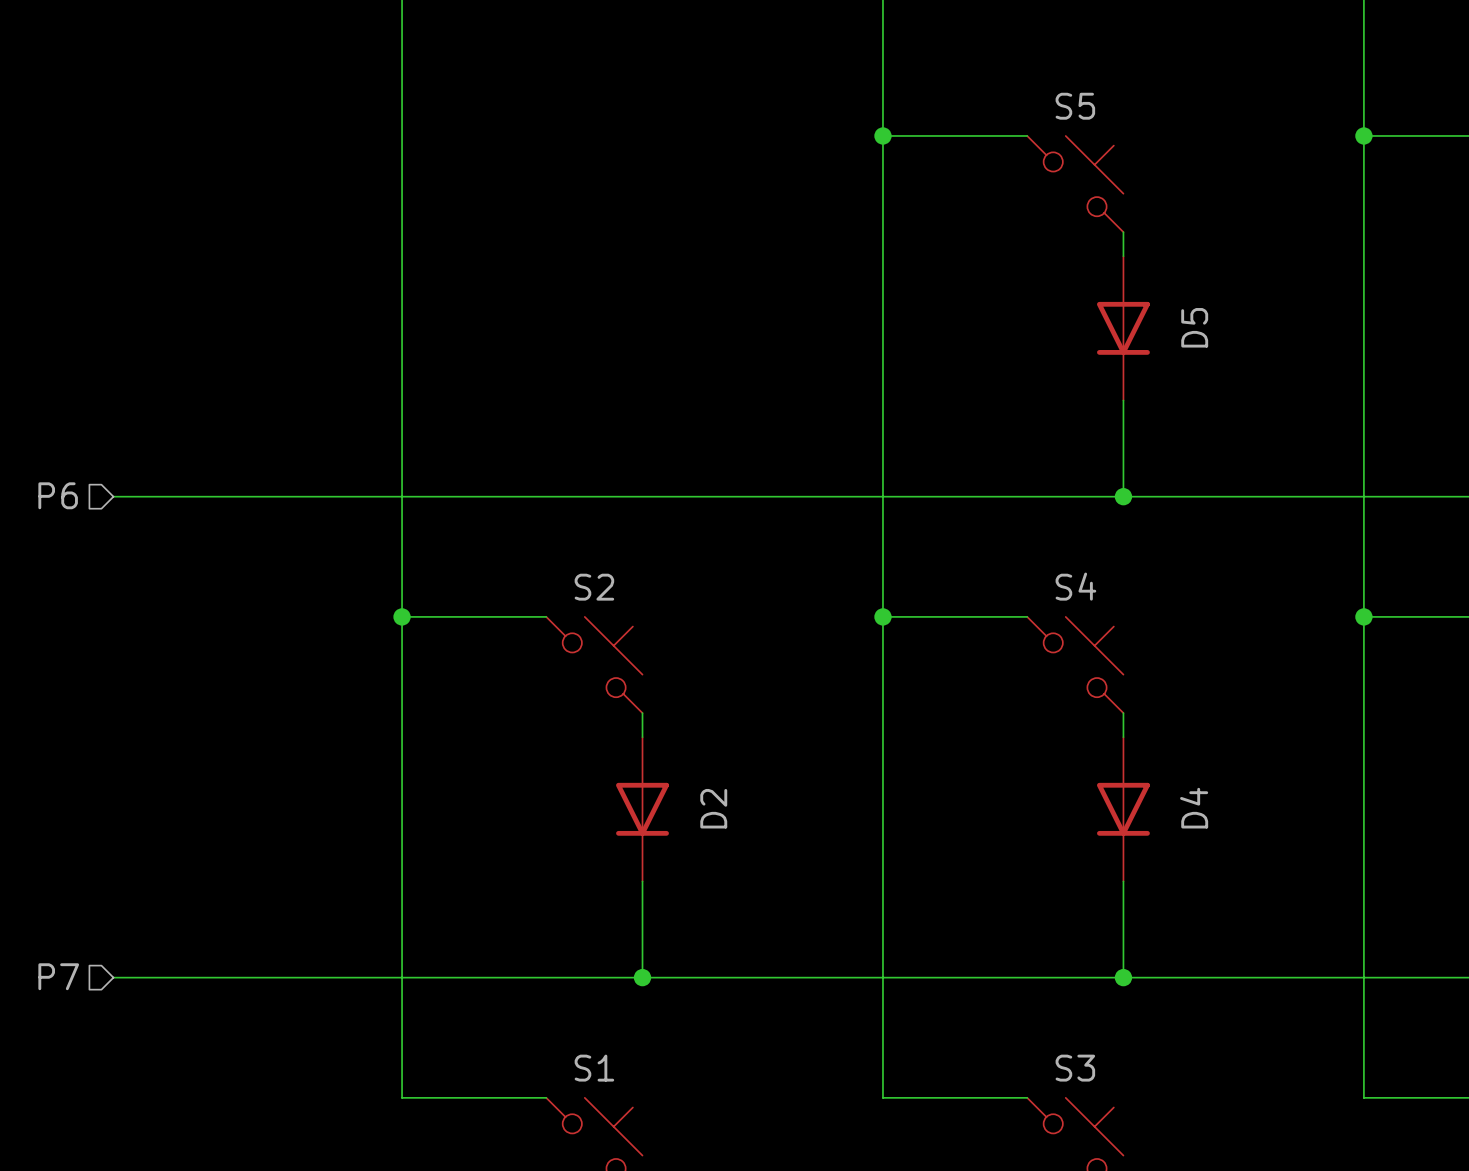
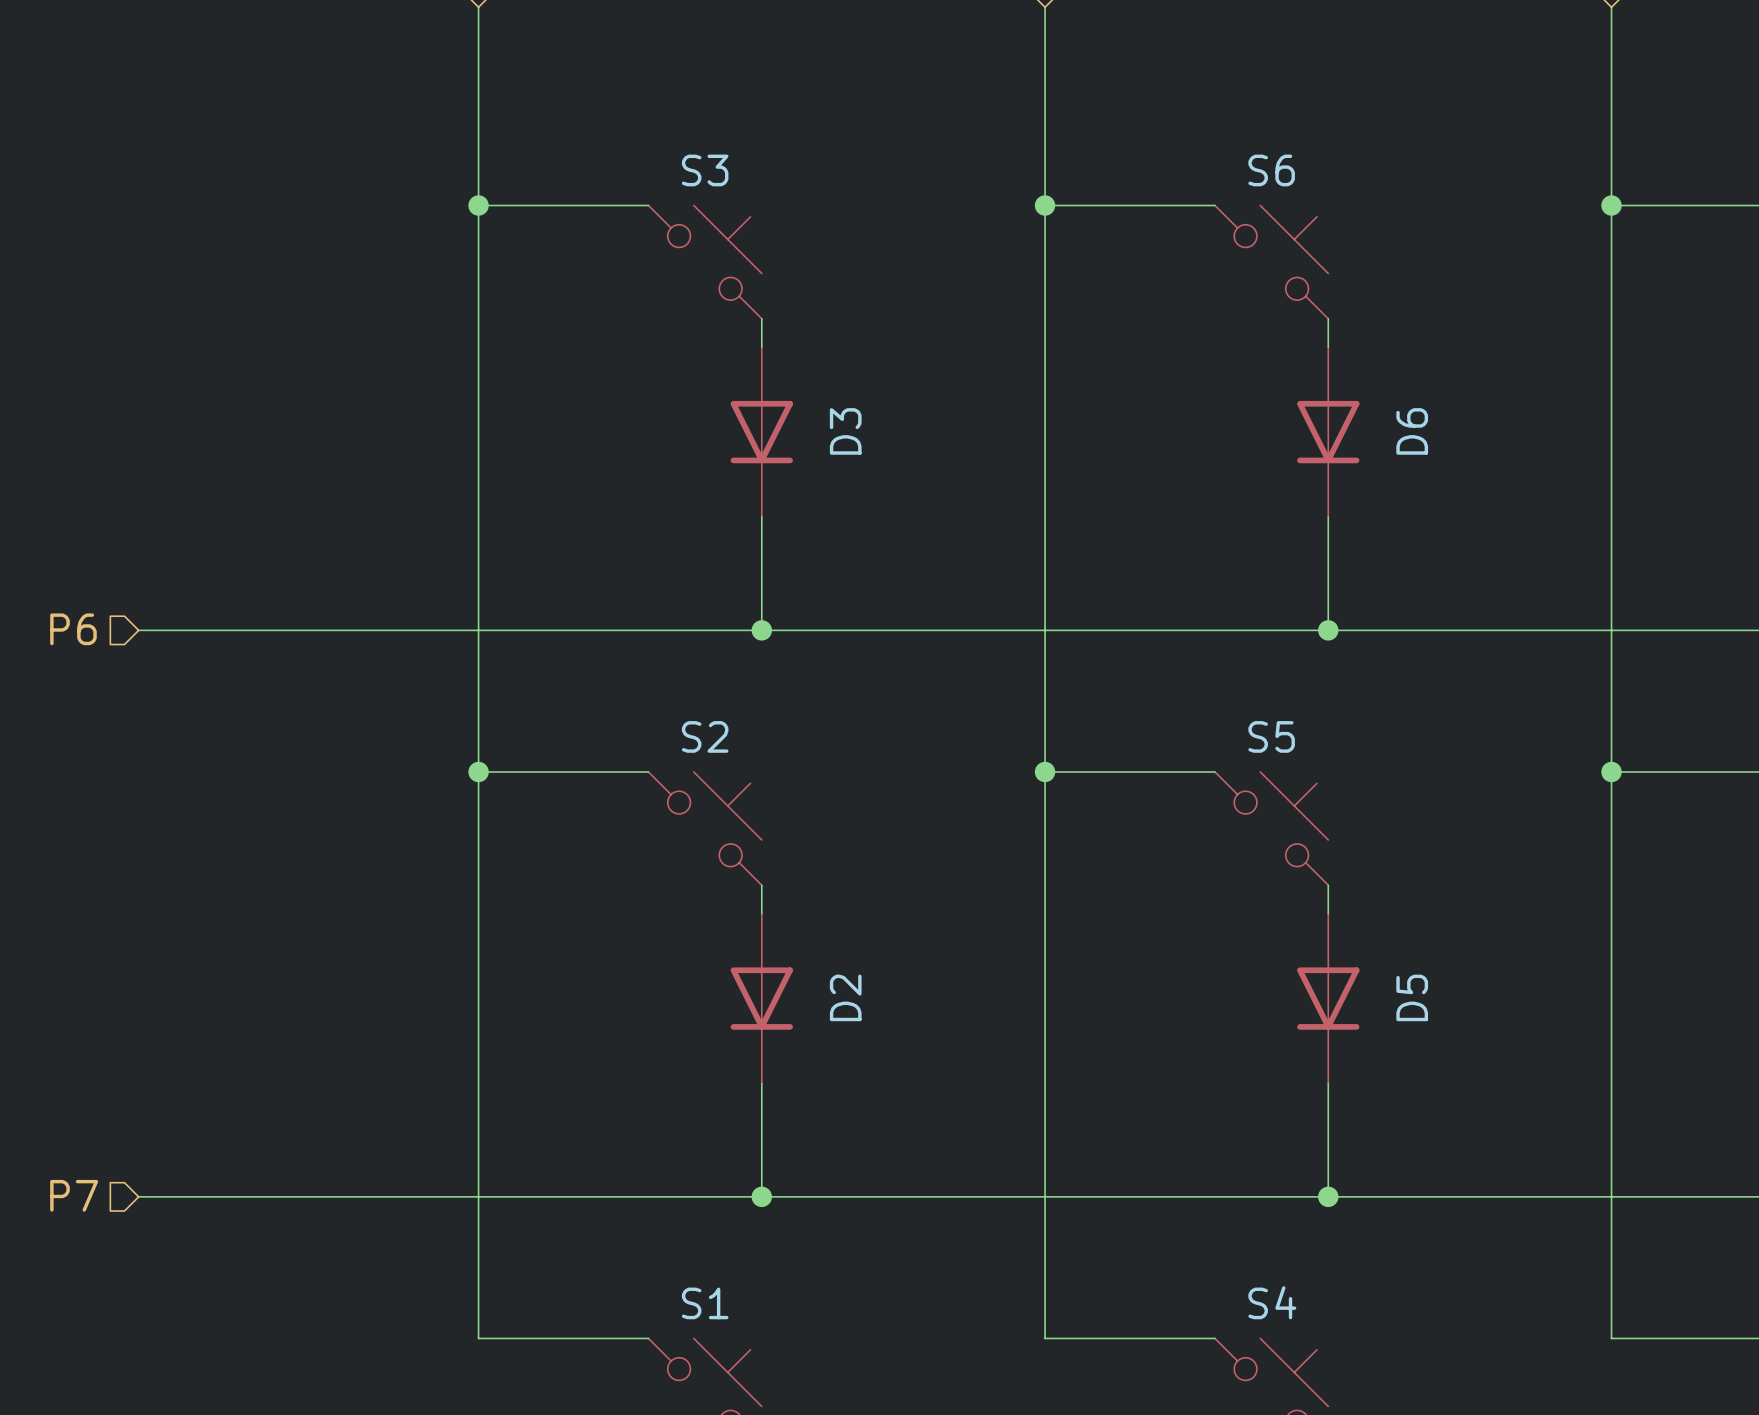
S5 name: S5 (1075, 106) -> S6 (1271, 170)
wire: none -> (478, 205) (648, 205)
junction: none -> (478, 205)
S3: none -> (705, 262)
wire: none -> (761, 318) (761, 347)
D5 name: D5 (1194, 327) -> D6 (1412, 431)
D3: none -> (761, 432)
wire: none -> (761, 517) (761, 630)
junction: none -> (761, 630)
S4 name: S4 (1075, 586) -> S5 (1271, 736)
D4 name: D4 (1194, 808) -> D5 (1412, 997)
S3 name: S3 (1075, 1068) -> S4 (1272, 1302)

